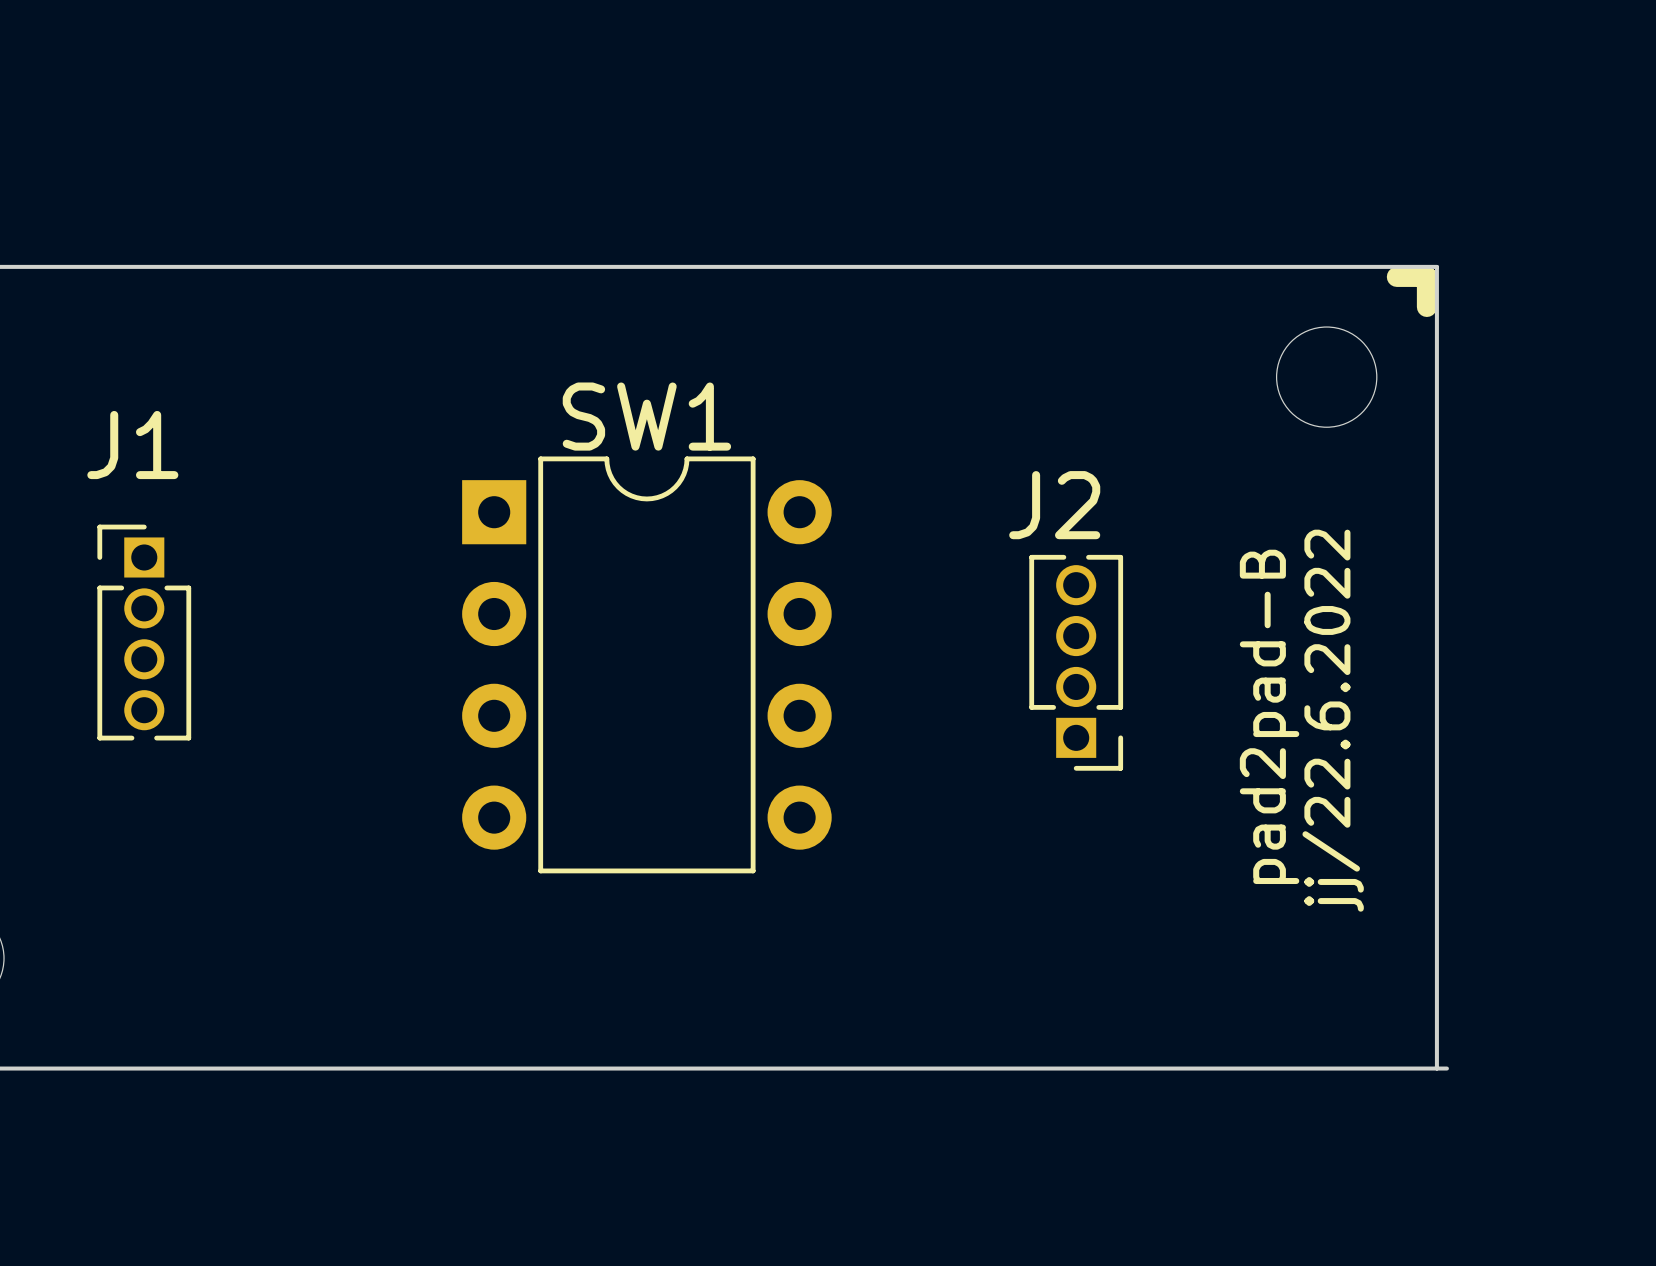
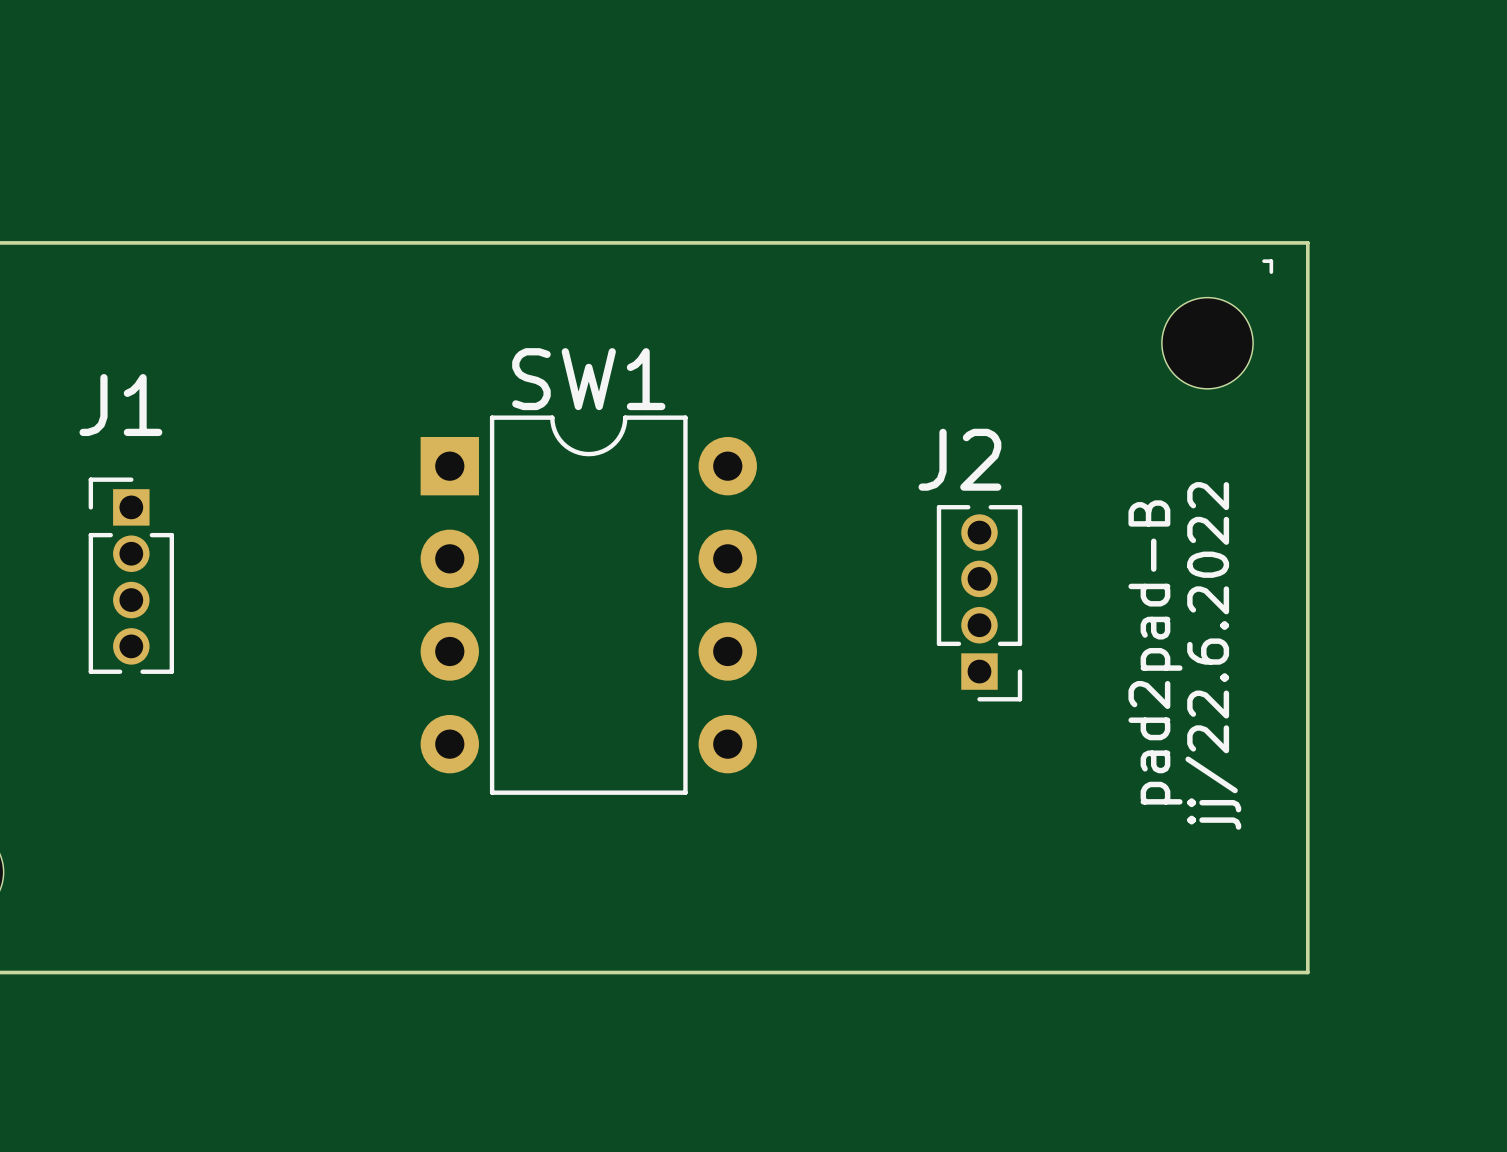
line: (1396, 276) (1426, 276) (1426, 306) -> none
line: none -> (1264, 261) (1271, 261) (1271, 272)
board edge: (1436, 1068) (1446, 1068) -> none

